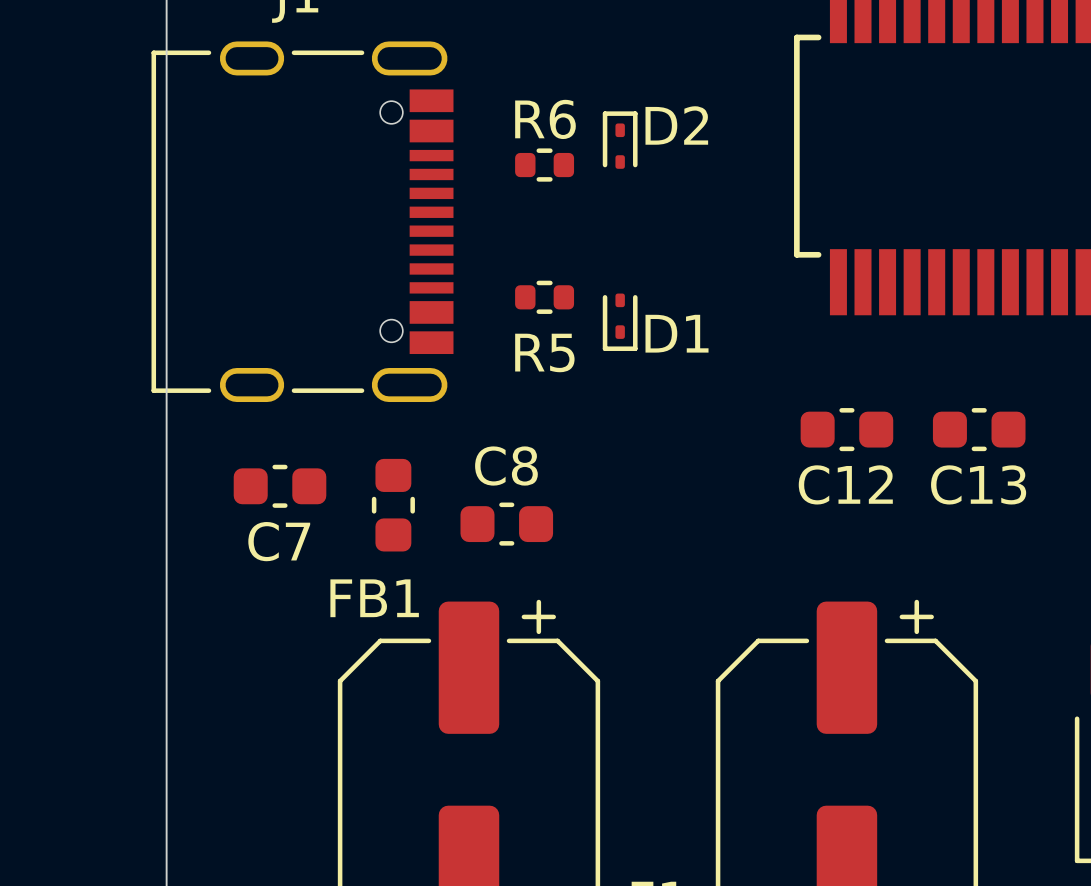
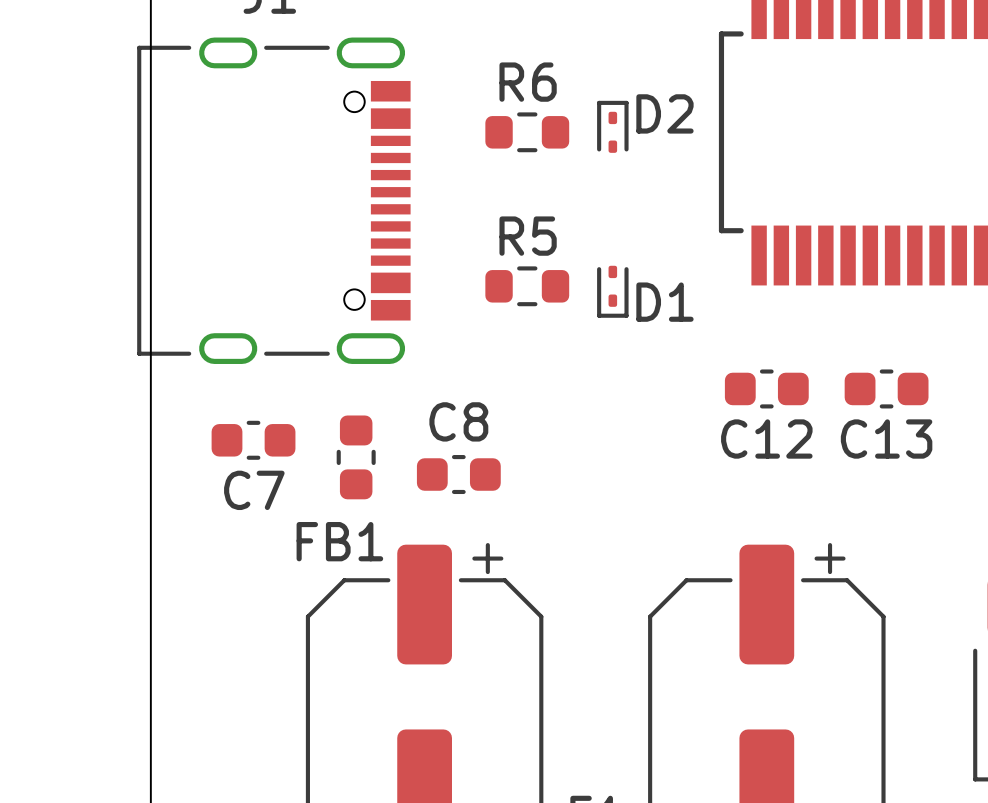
D2 position: (620, 140) -> (612, 126)
R6 footprint: [515, 148, 575, 182] -> [485, 112, 570, 153]
R5 footprint: [515, 280, 575, 314] -> [485, 266, 570, 307]
D1 position: (620, 322) -> (612, 291)
R5 name position: R5 (544, 352) -> R5 (528, 236)

